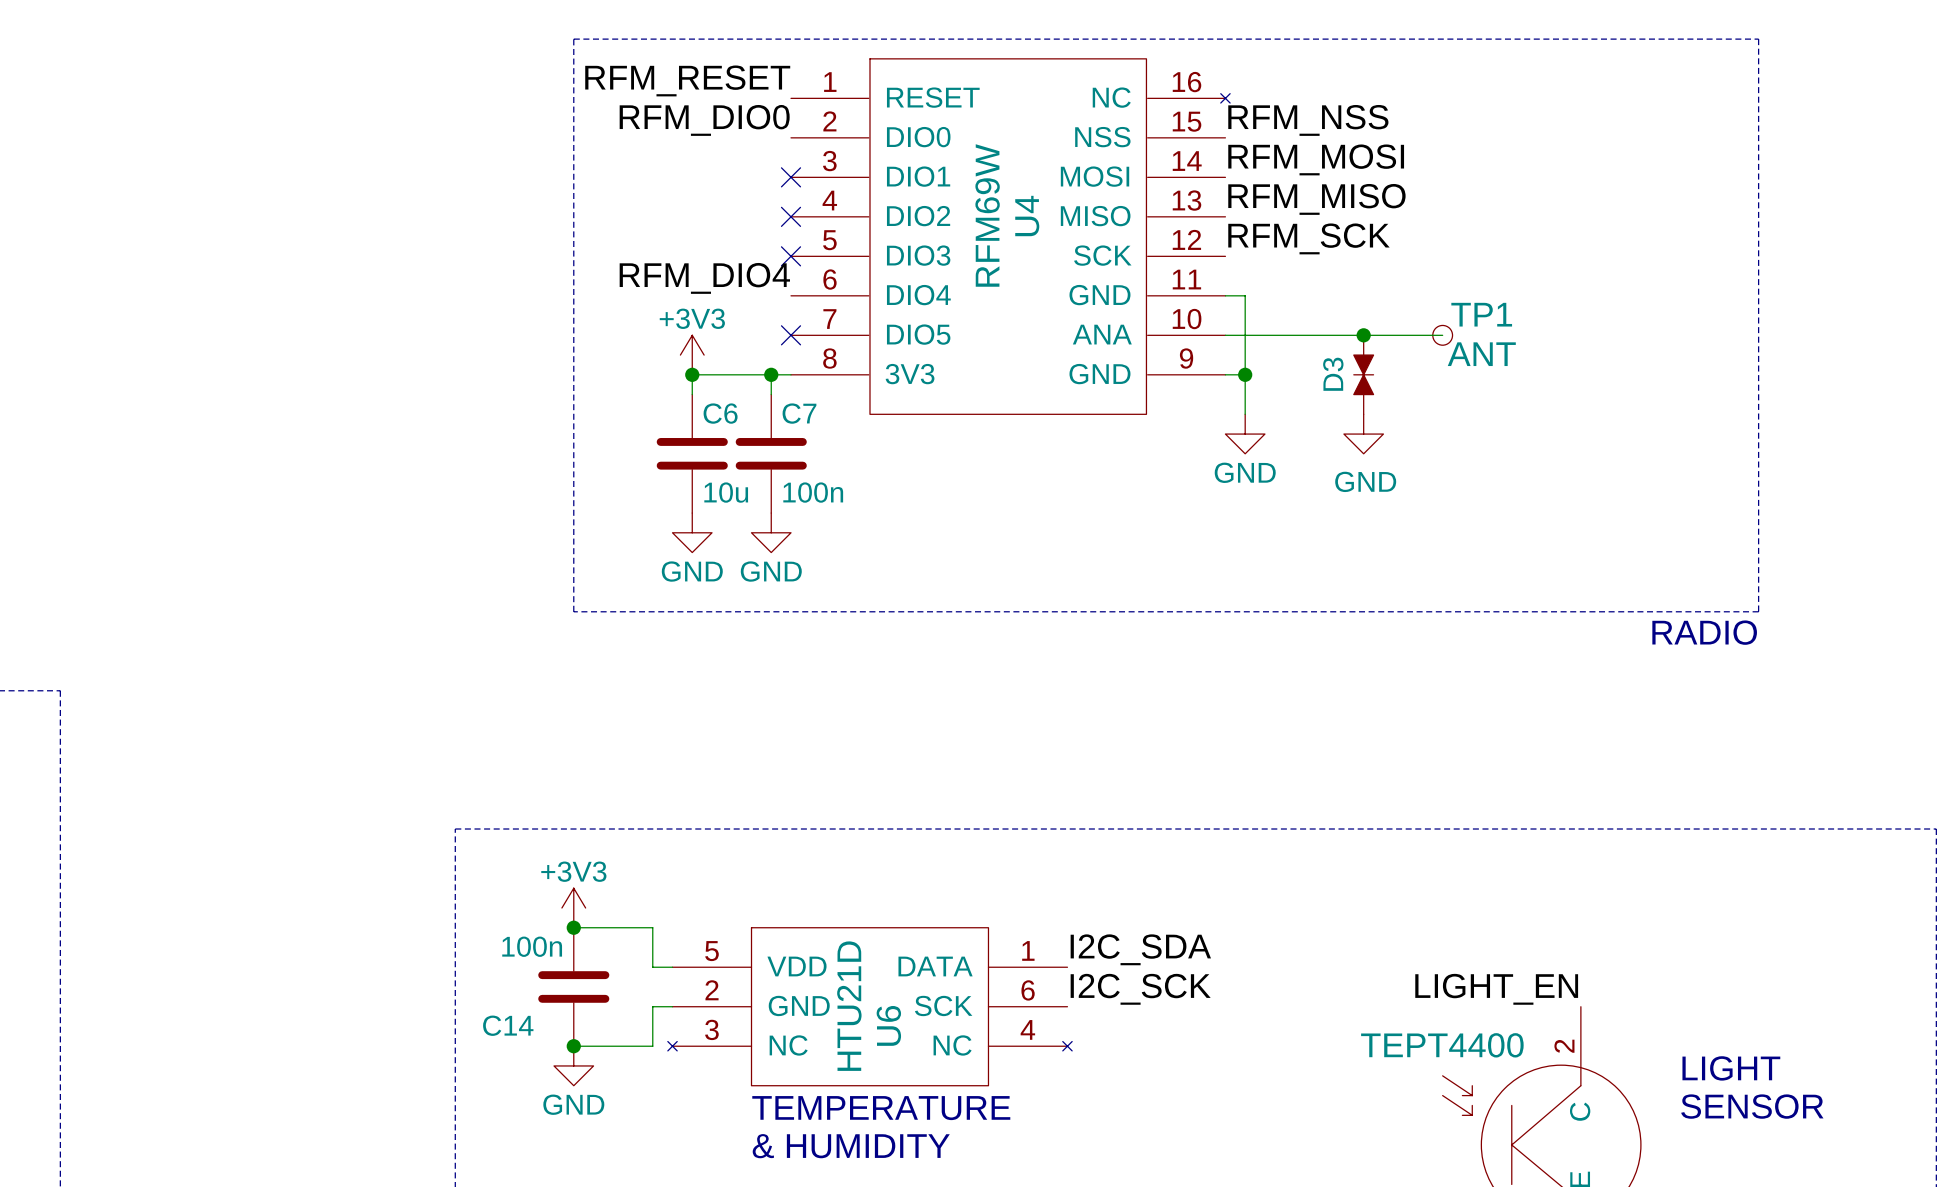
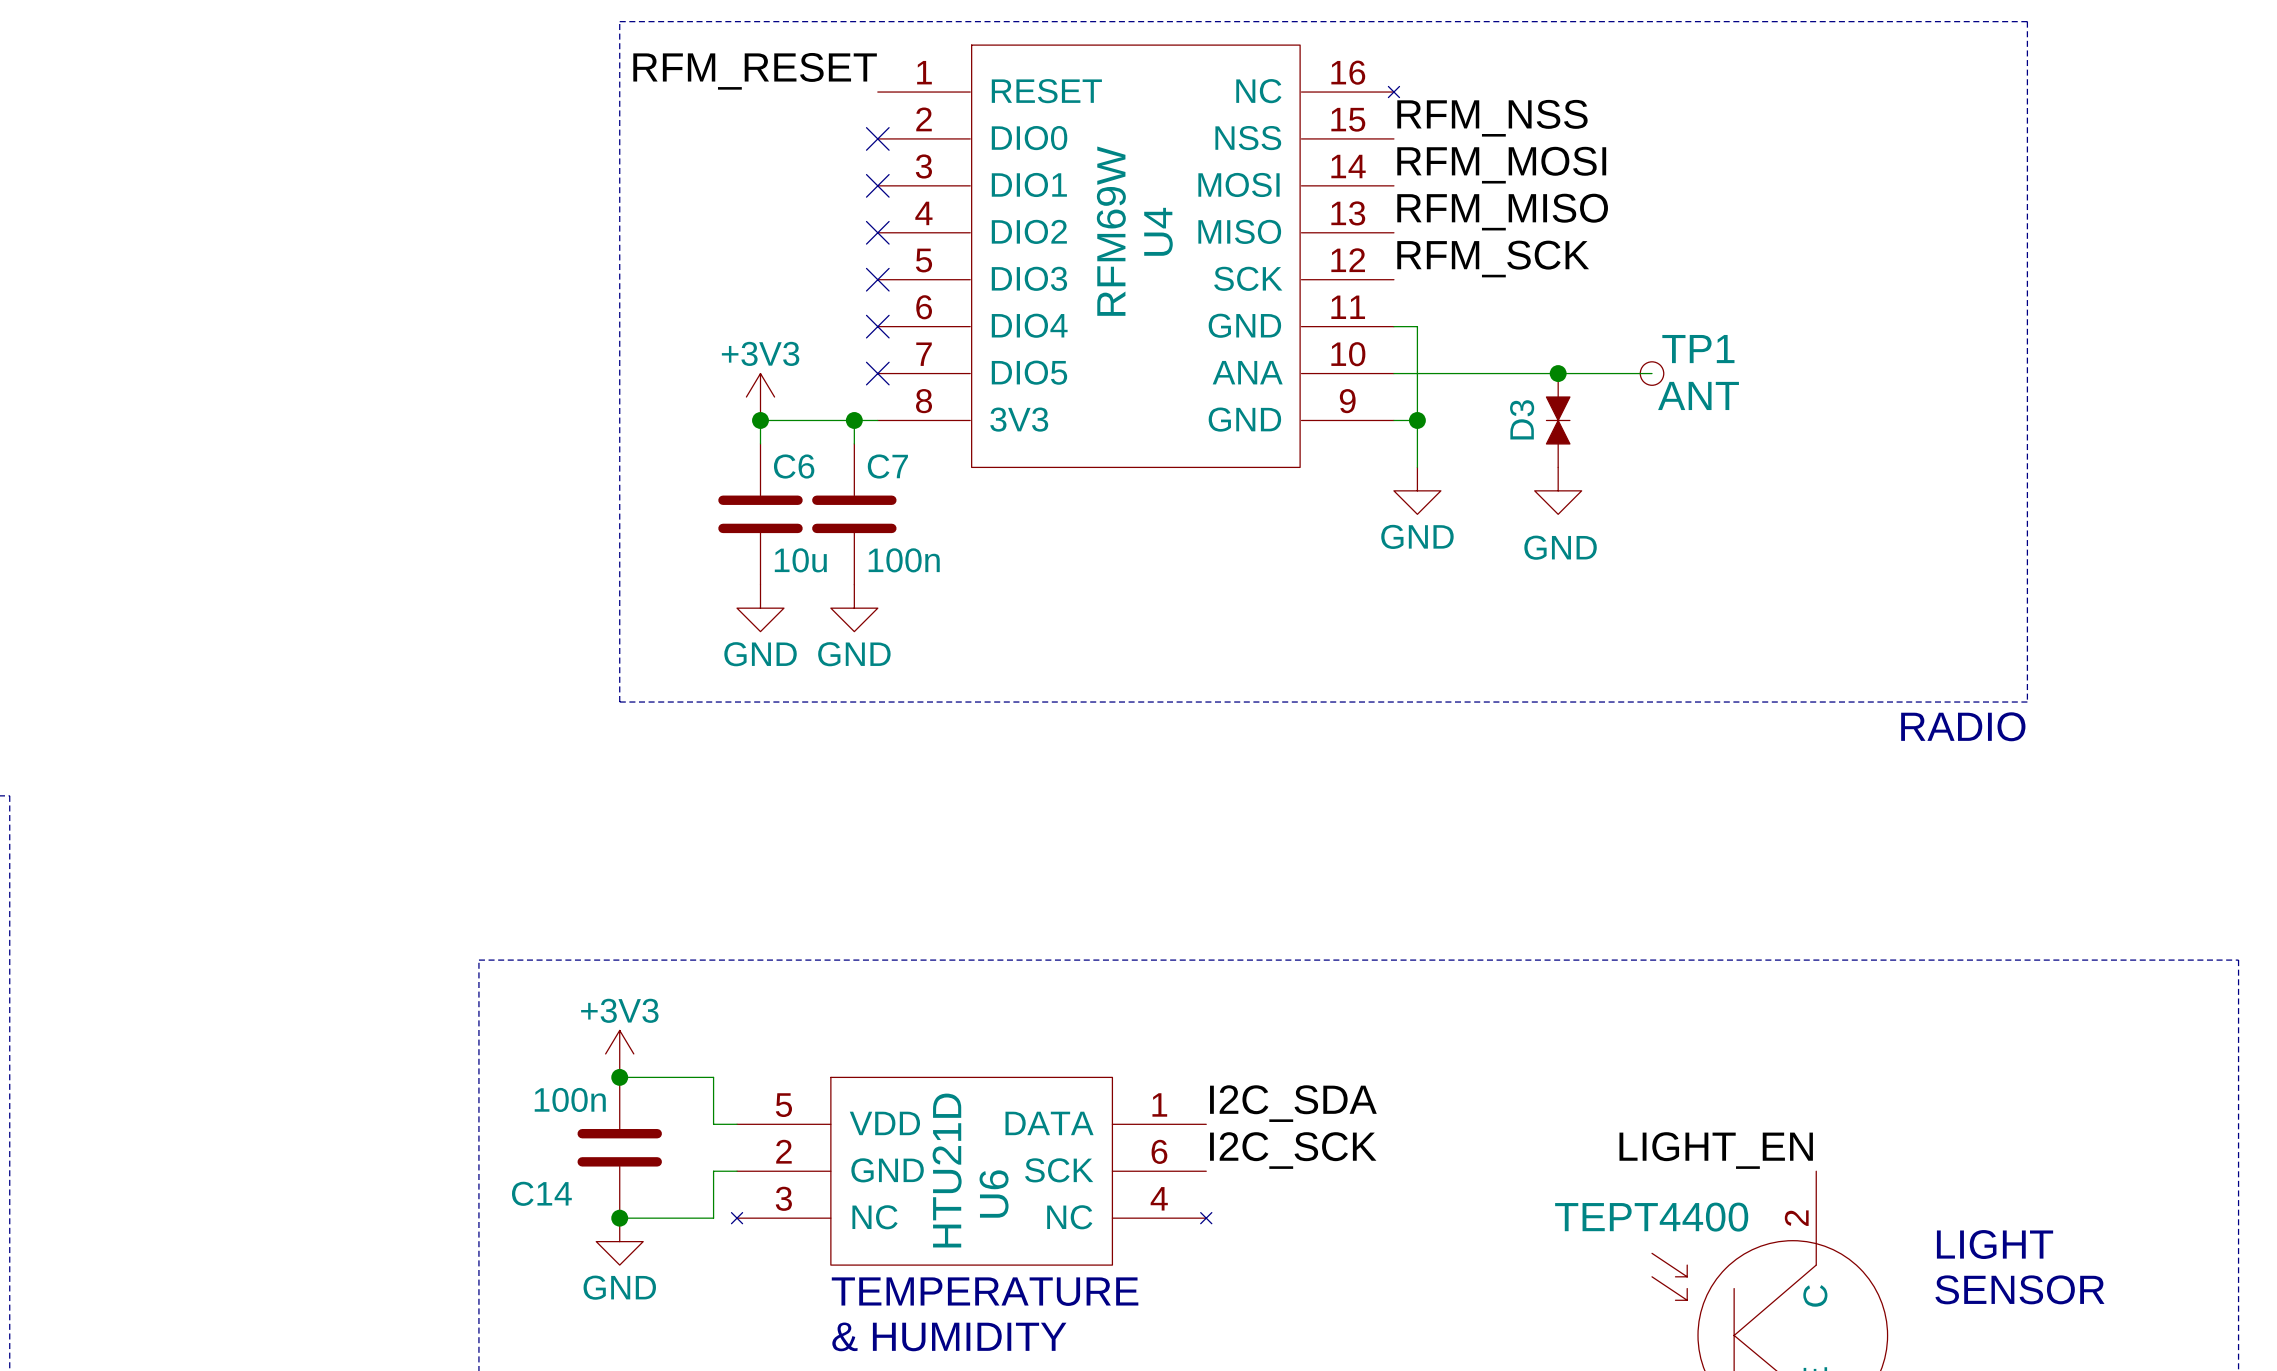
label: RFM_DIO0 (704, 120) -> none
no-connect mark: none -> (877, 138)
label: RFM_DIO4 (704, 278) -> none
no-connect mark: none -> (877, 326)

